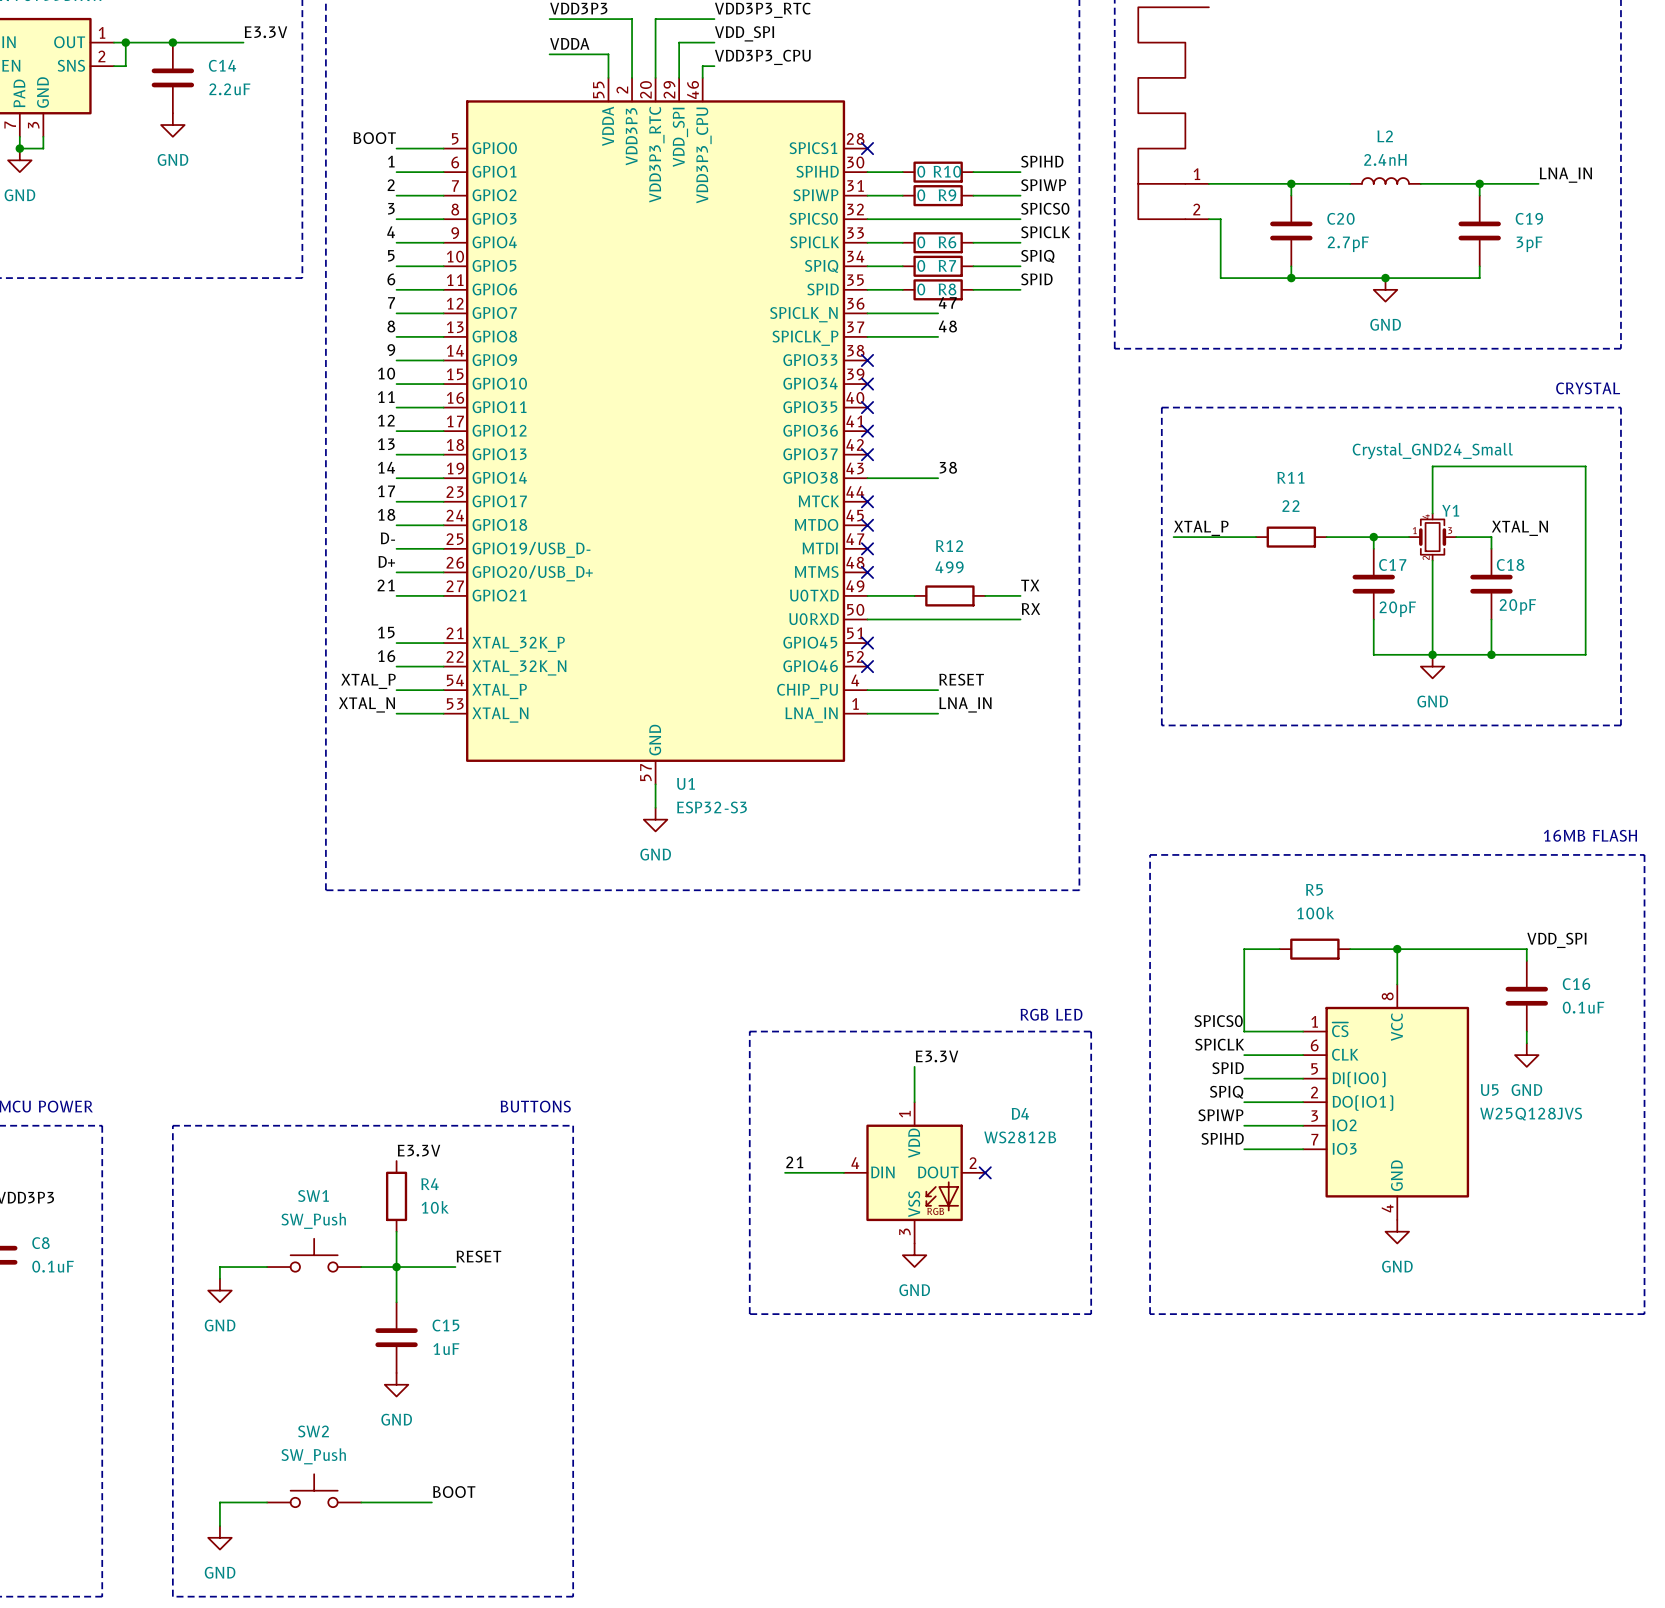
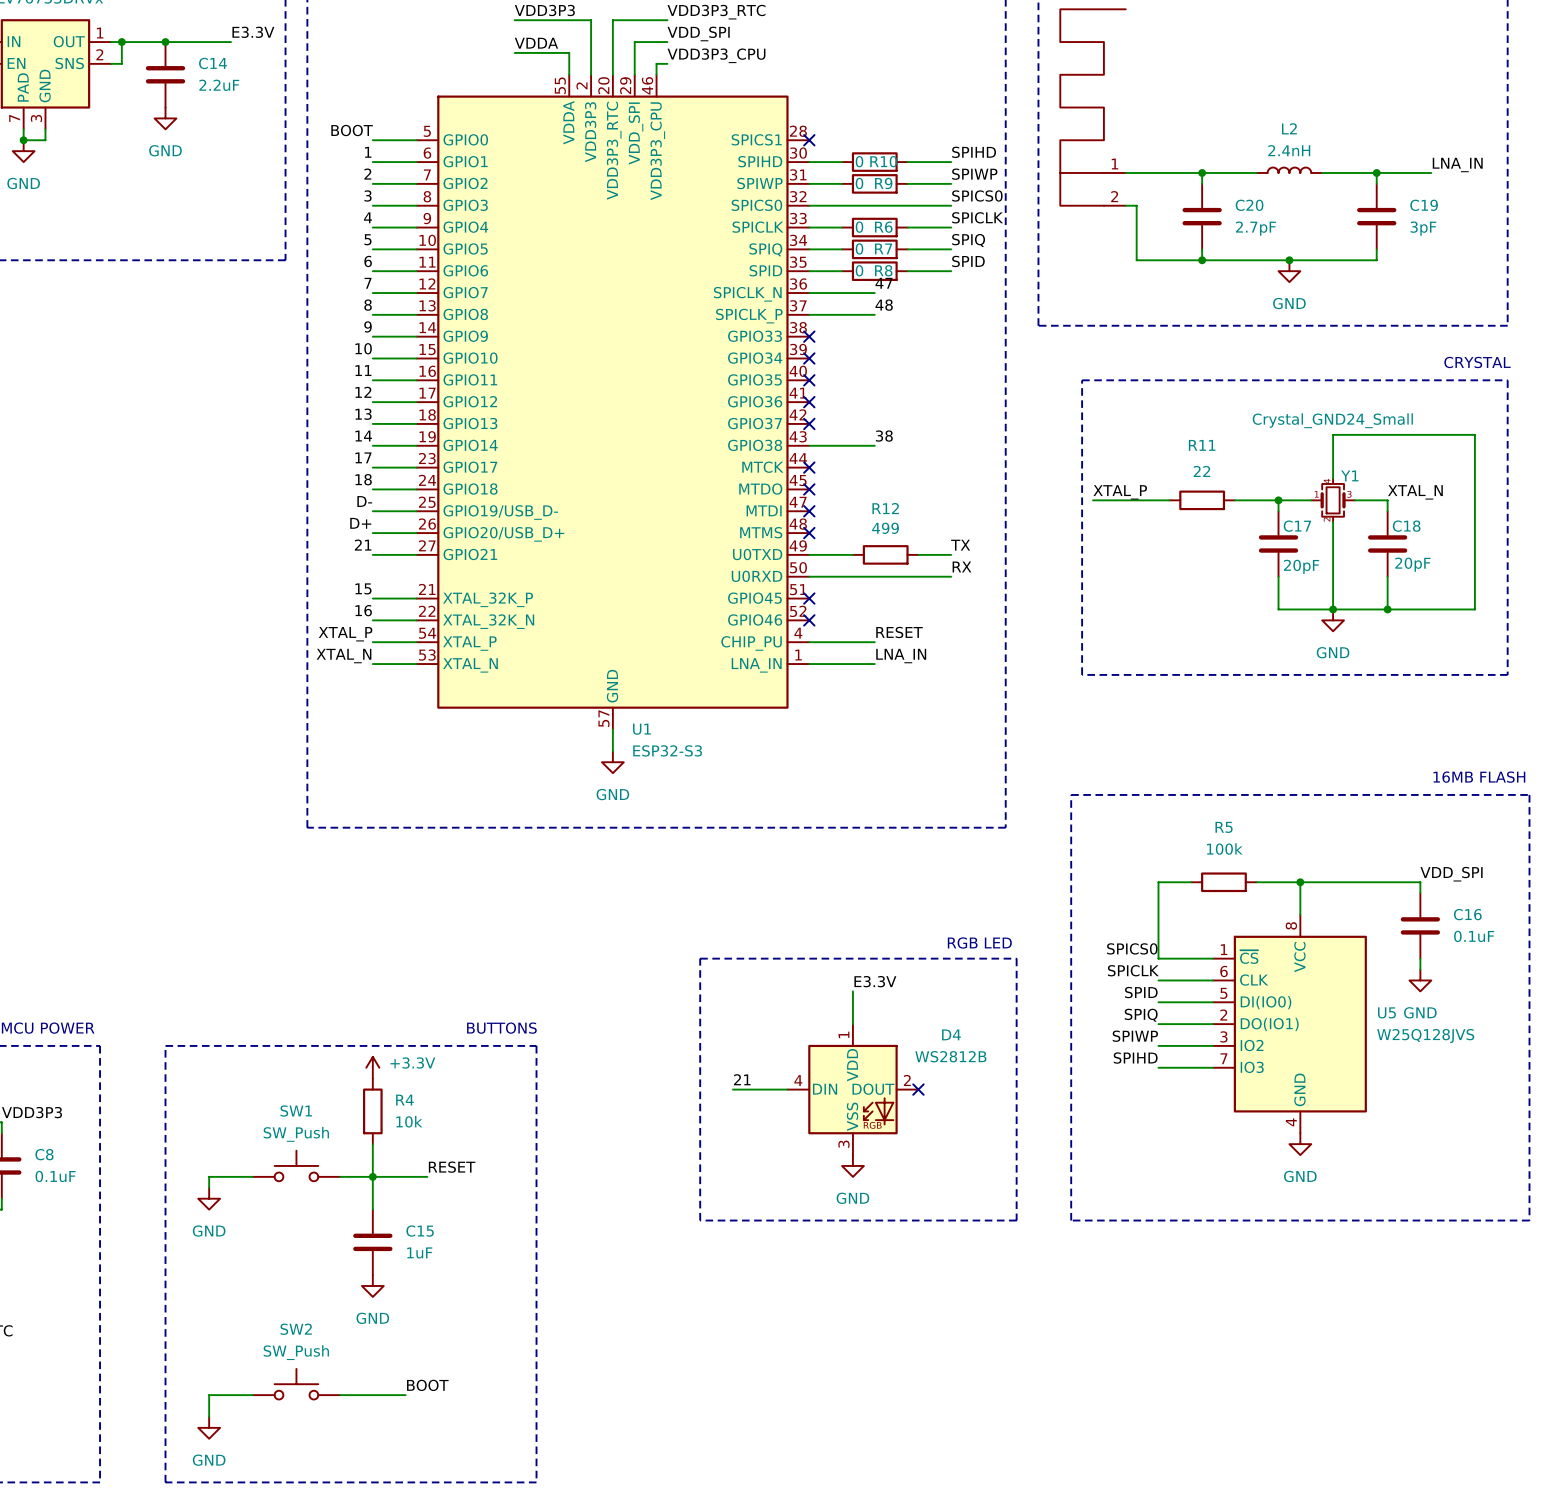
power symbol: none -> +3.3V (372, 1067)
label: E3.3V (419, 1150) -> none

